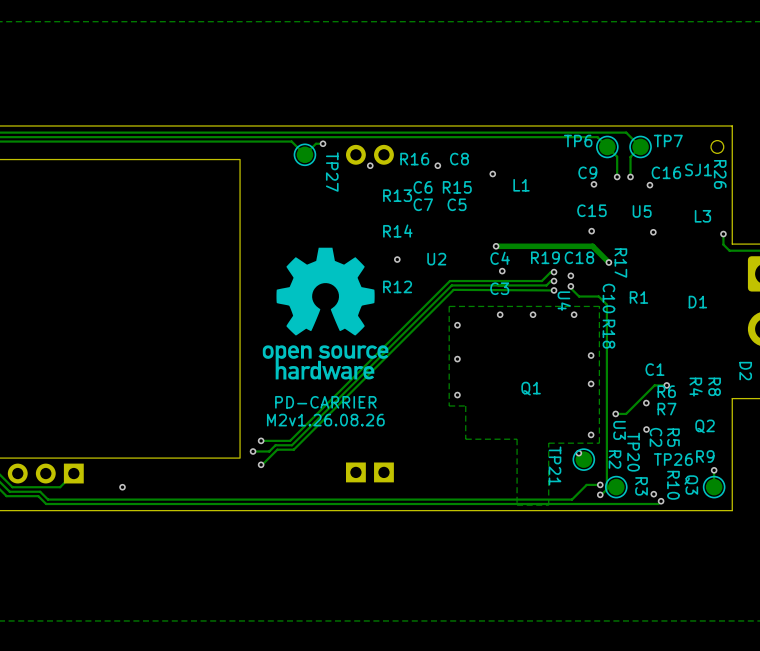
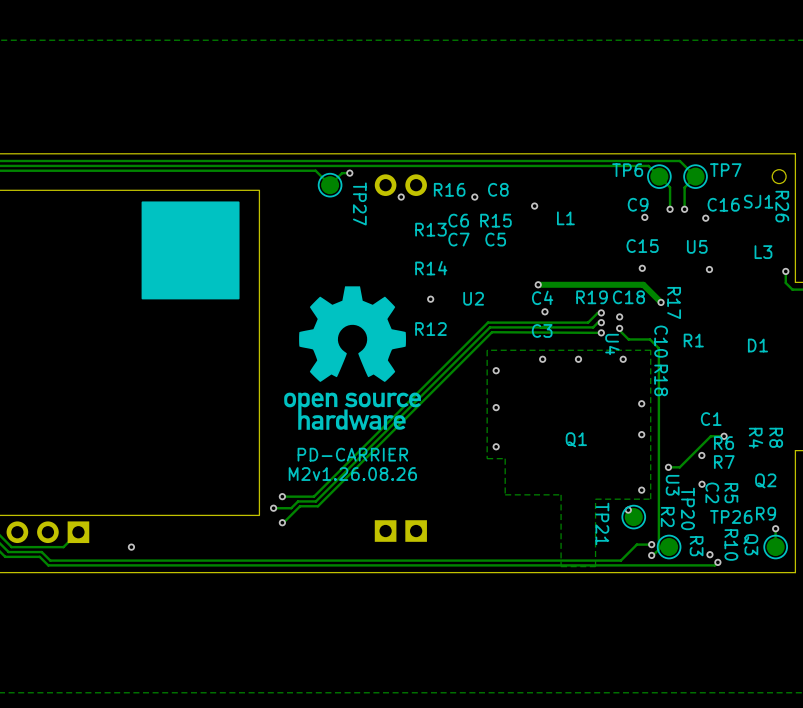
drawing: none -> [141, 201, 240, 300]

